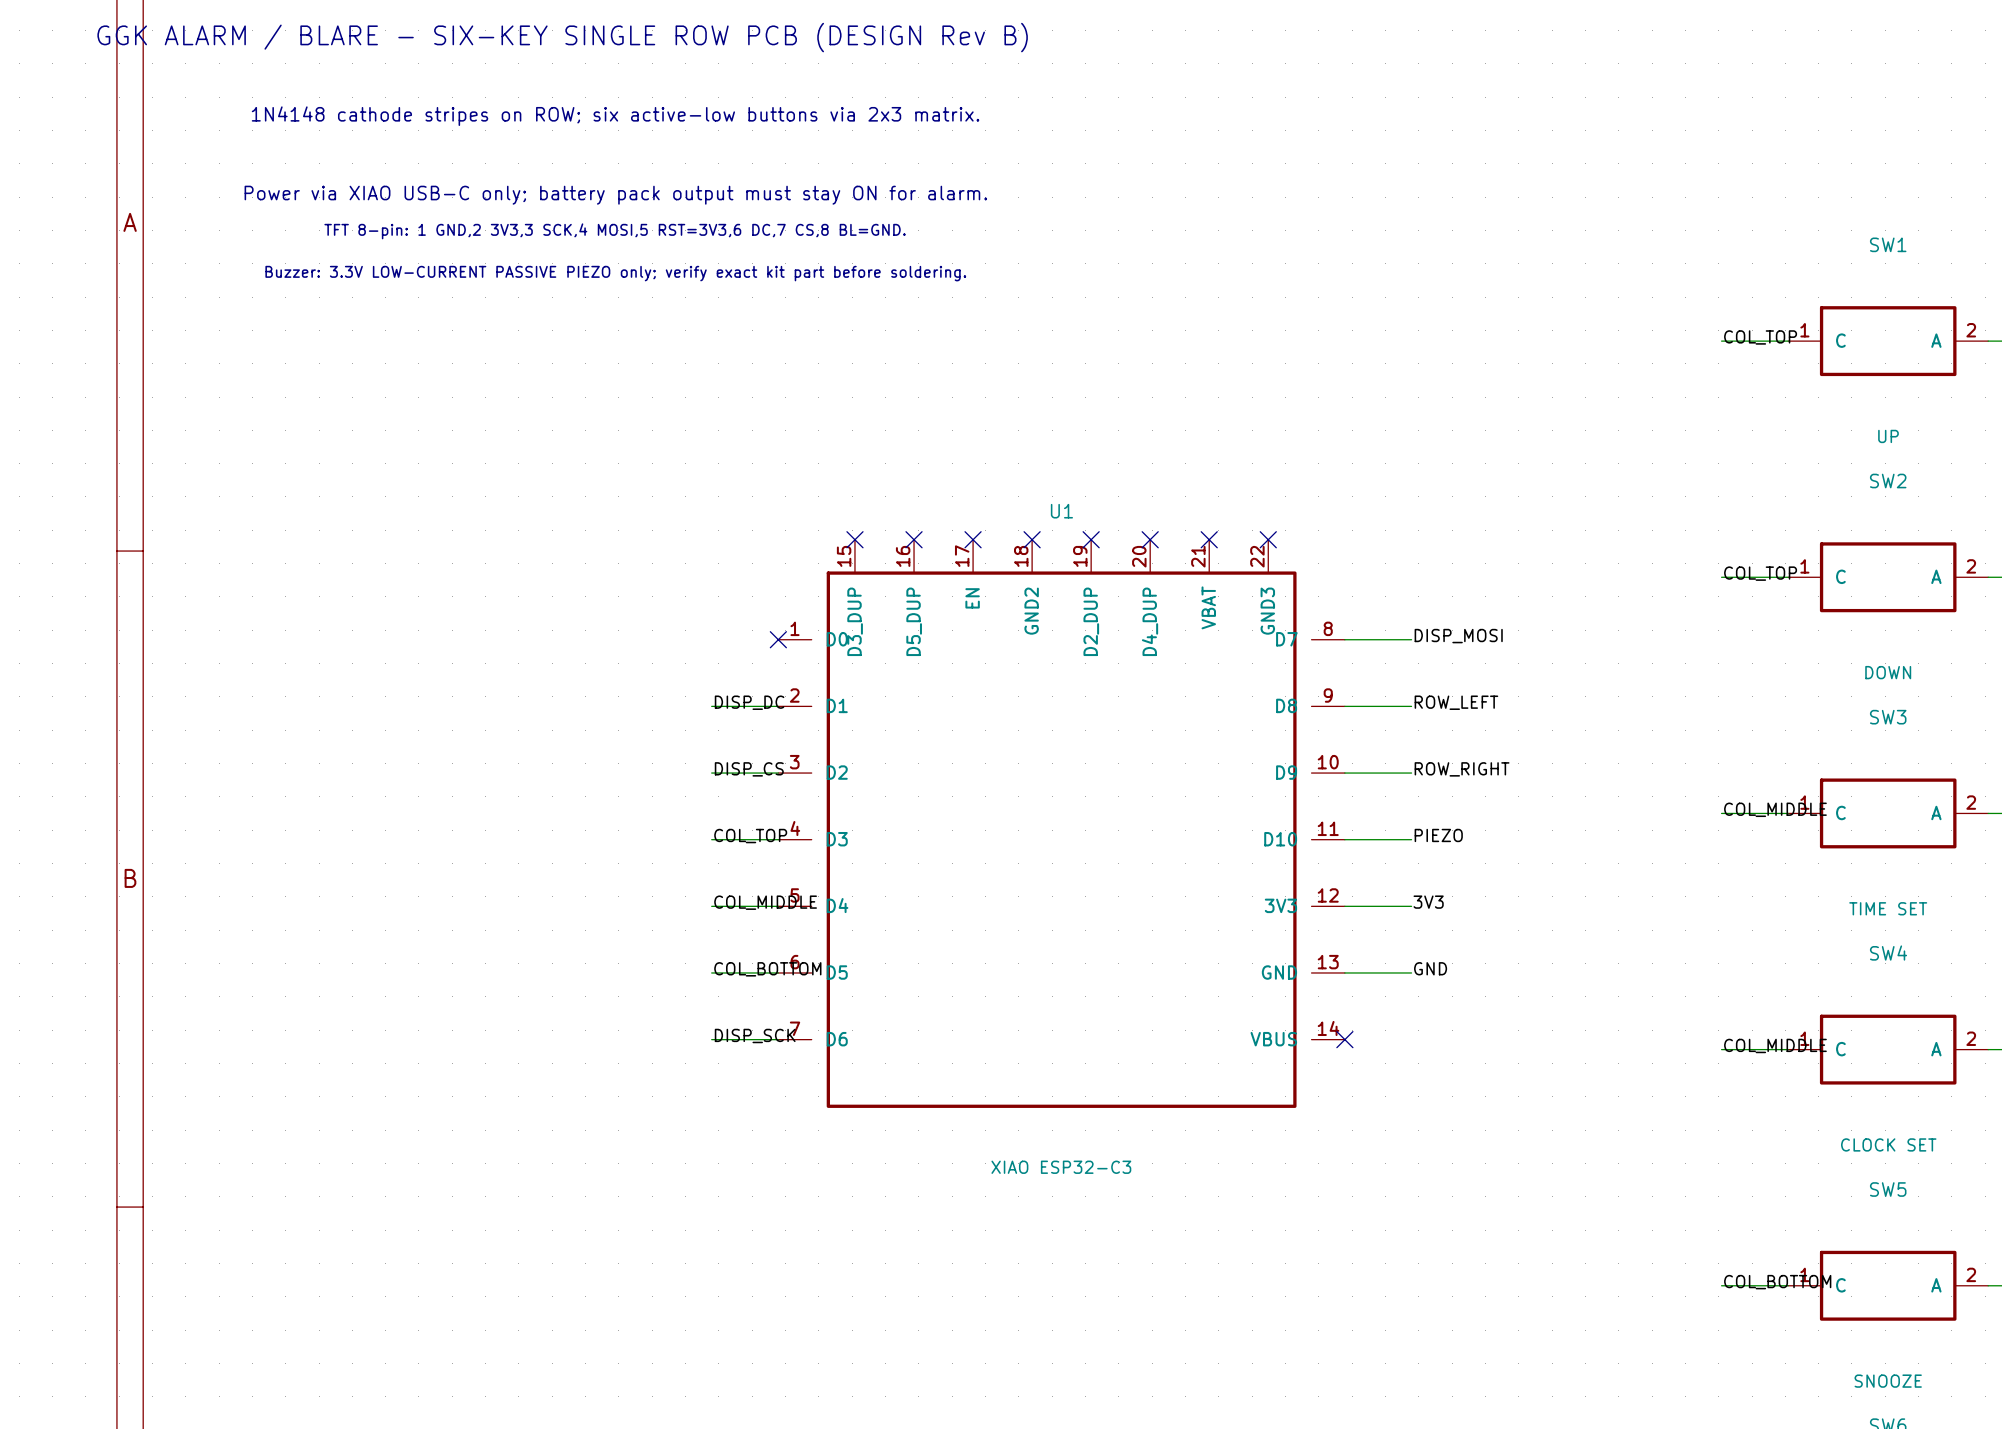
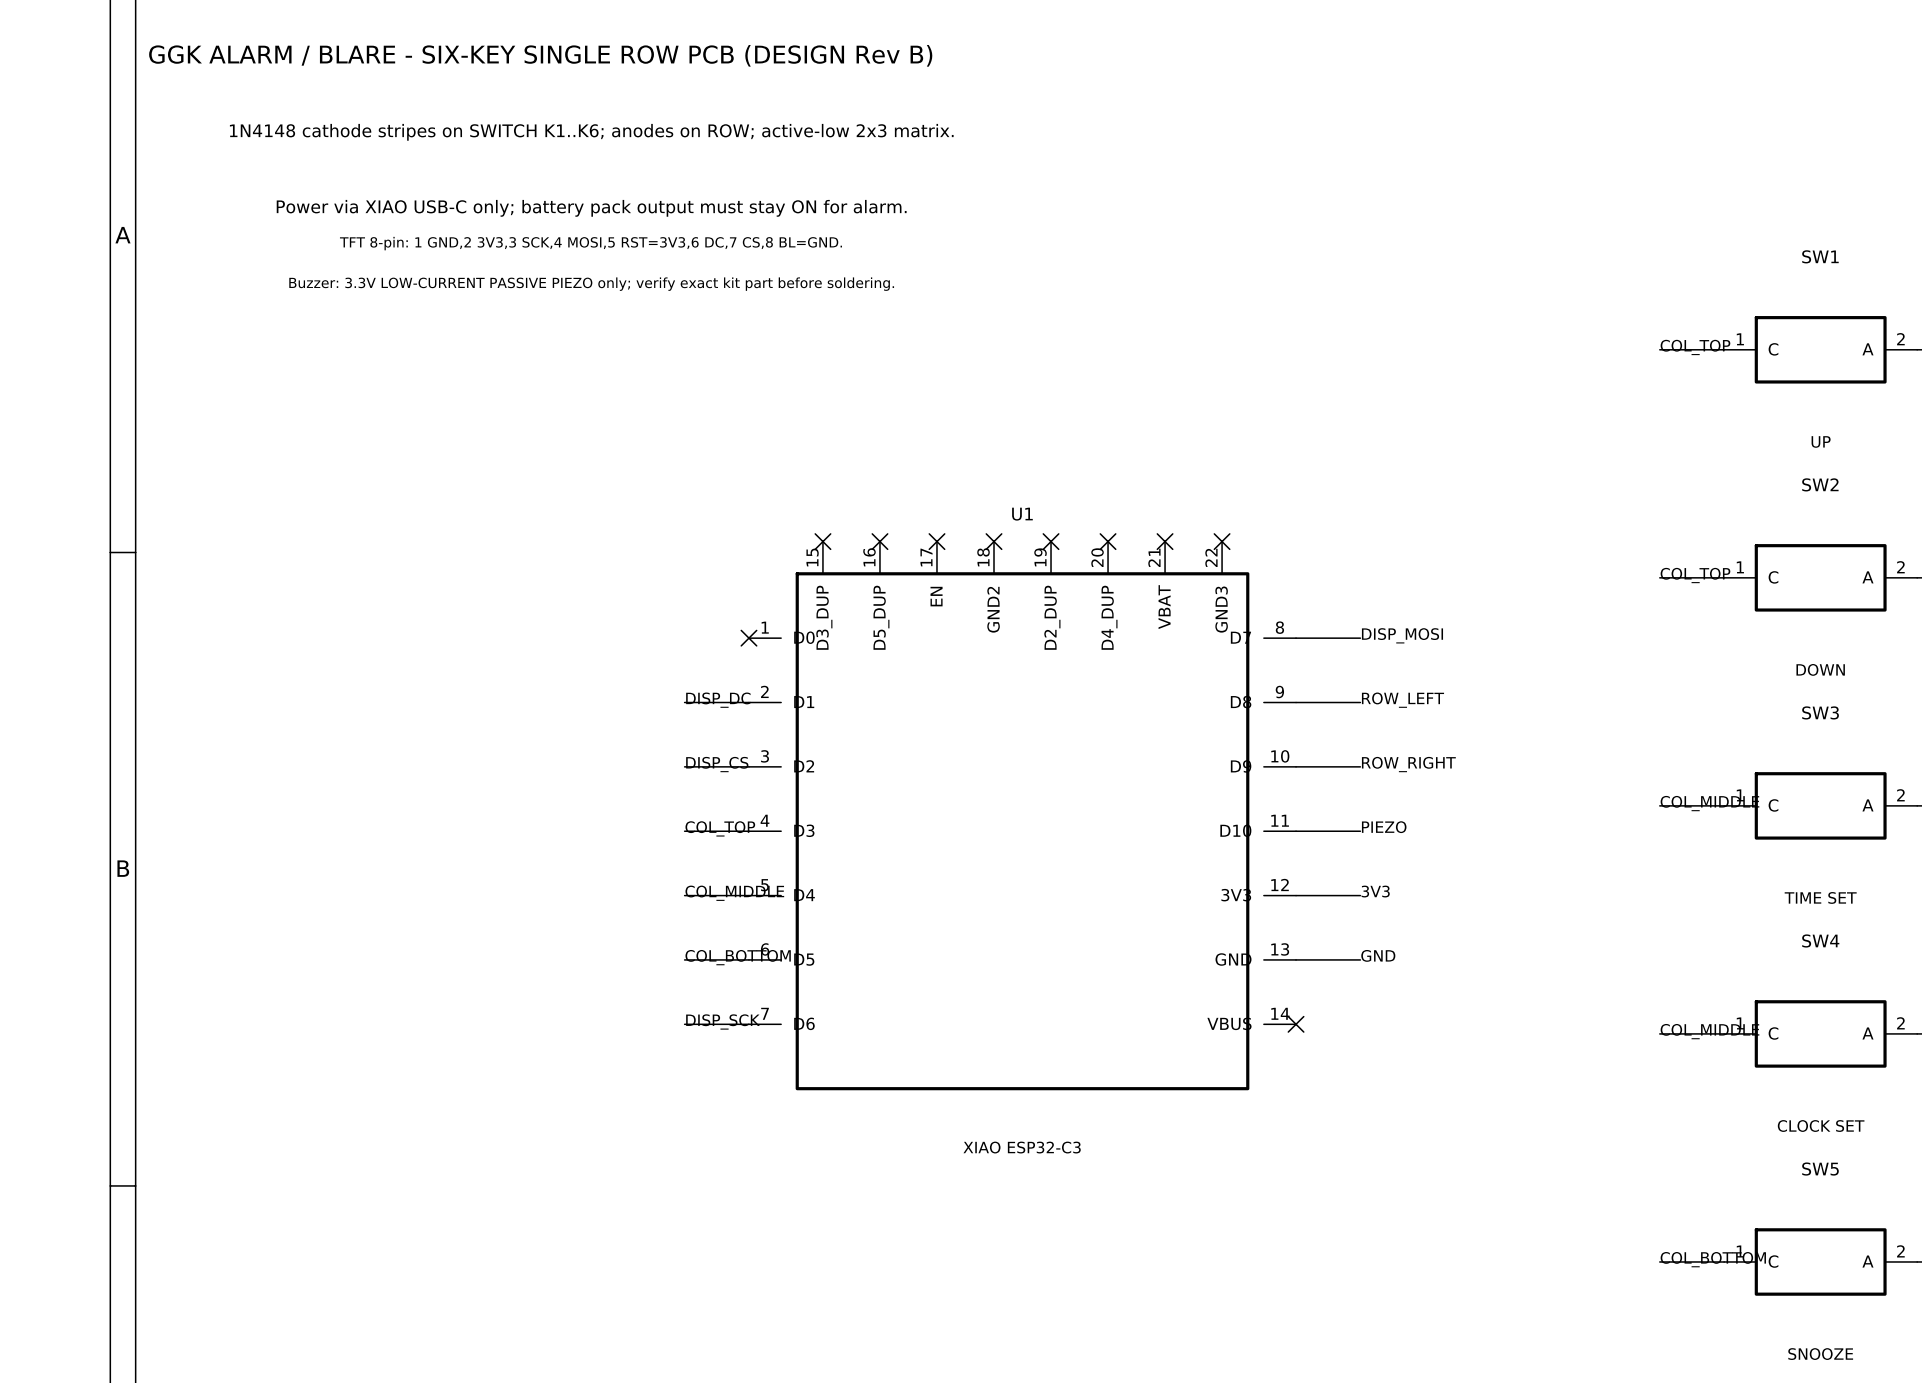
text: 1N4148 cathode stripes on ROW; six active-low buttons via 2x3 matrix. (615, 116) -> 1N4148 cathode stripes on SWITCH K1..K6; anodes on ROW; active-low 2x3 matrix. (591, 132)

